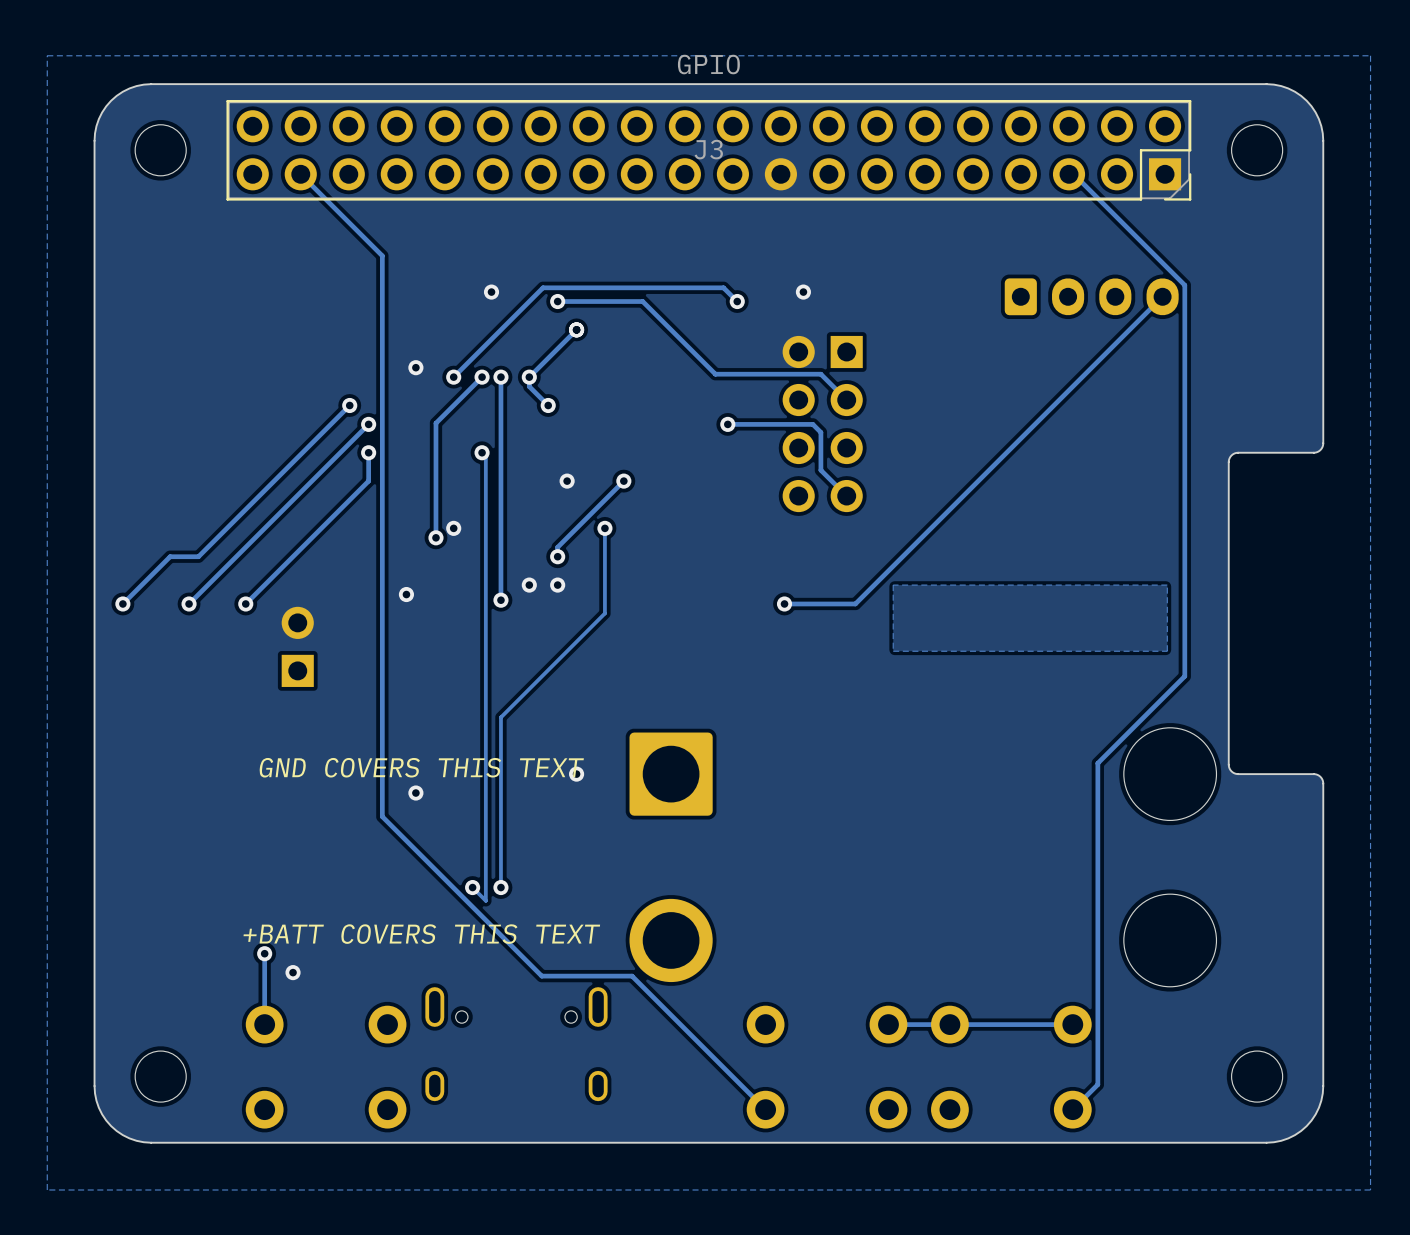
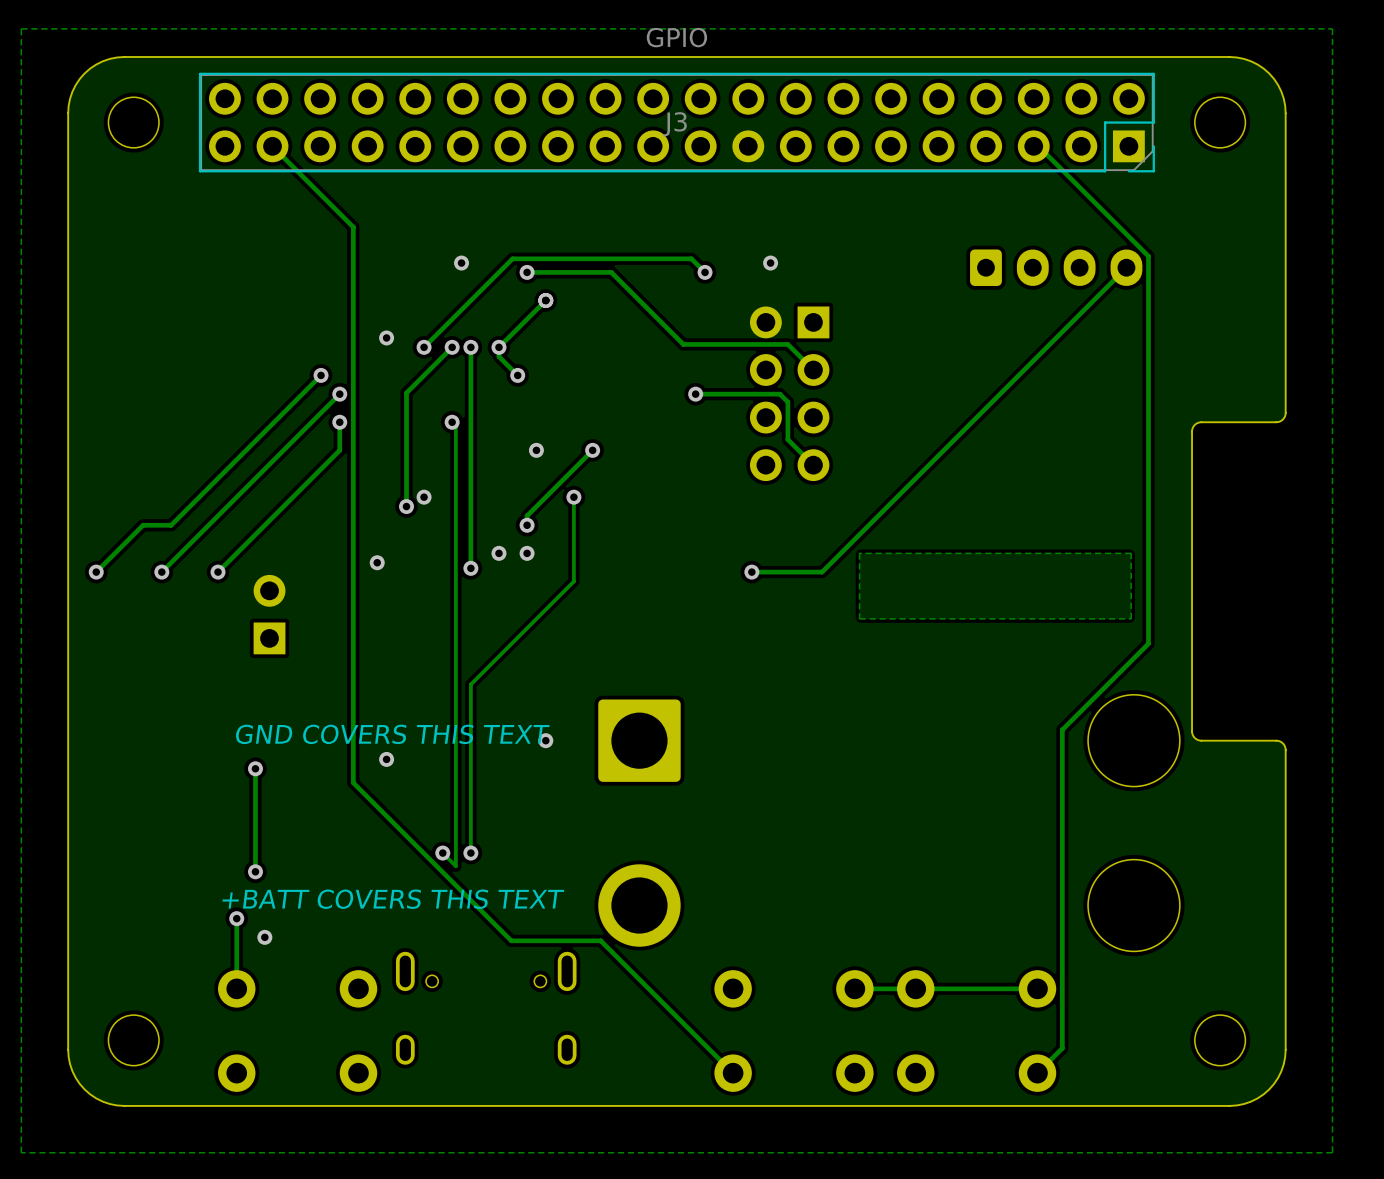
track: none -> (255, 768) (255, 871)
via: none -> (255, 768)
via: none -> (255, 871)

